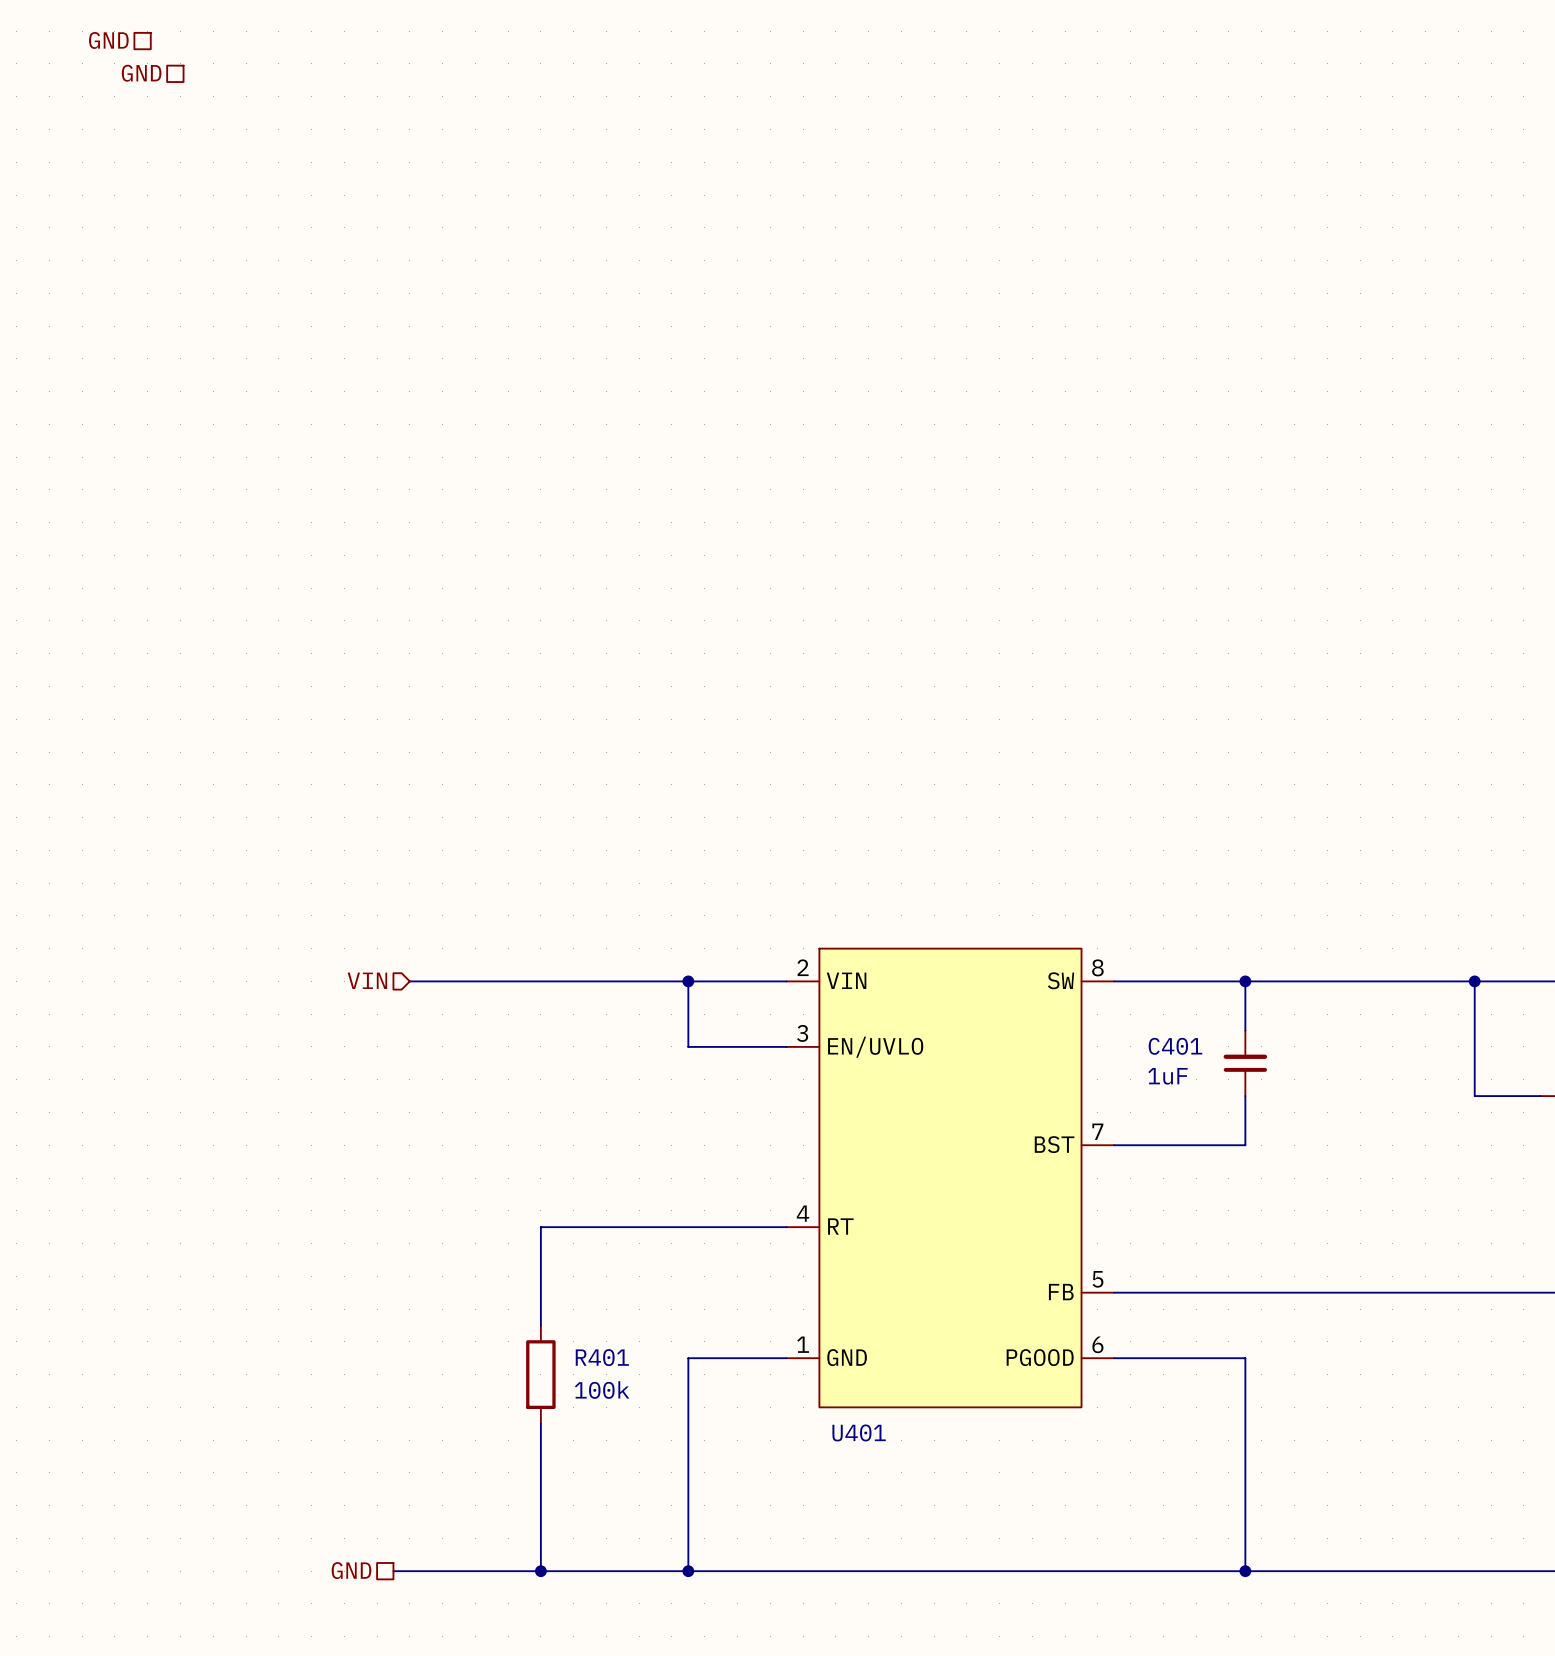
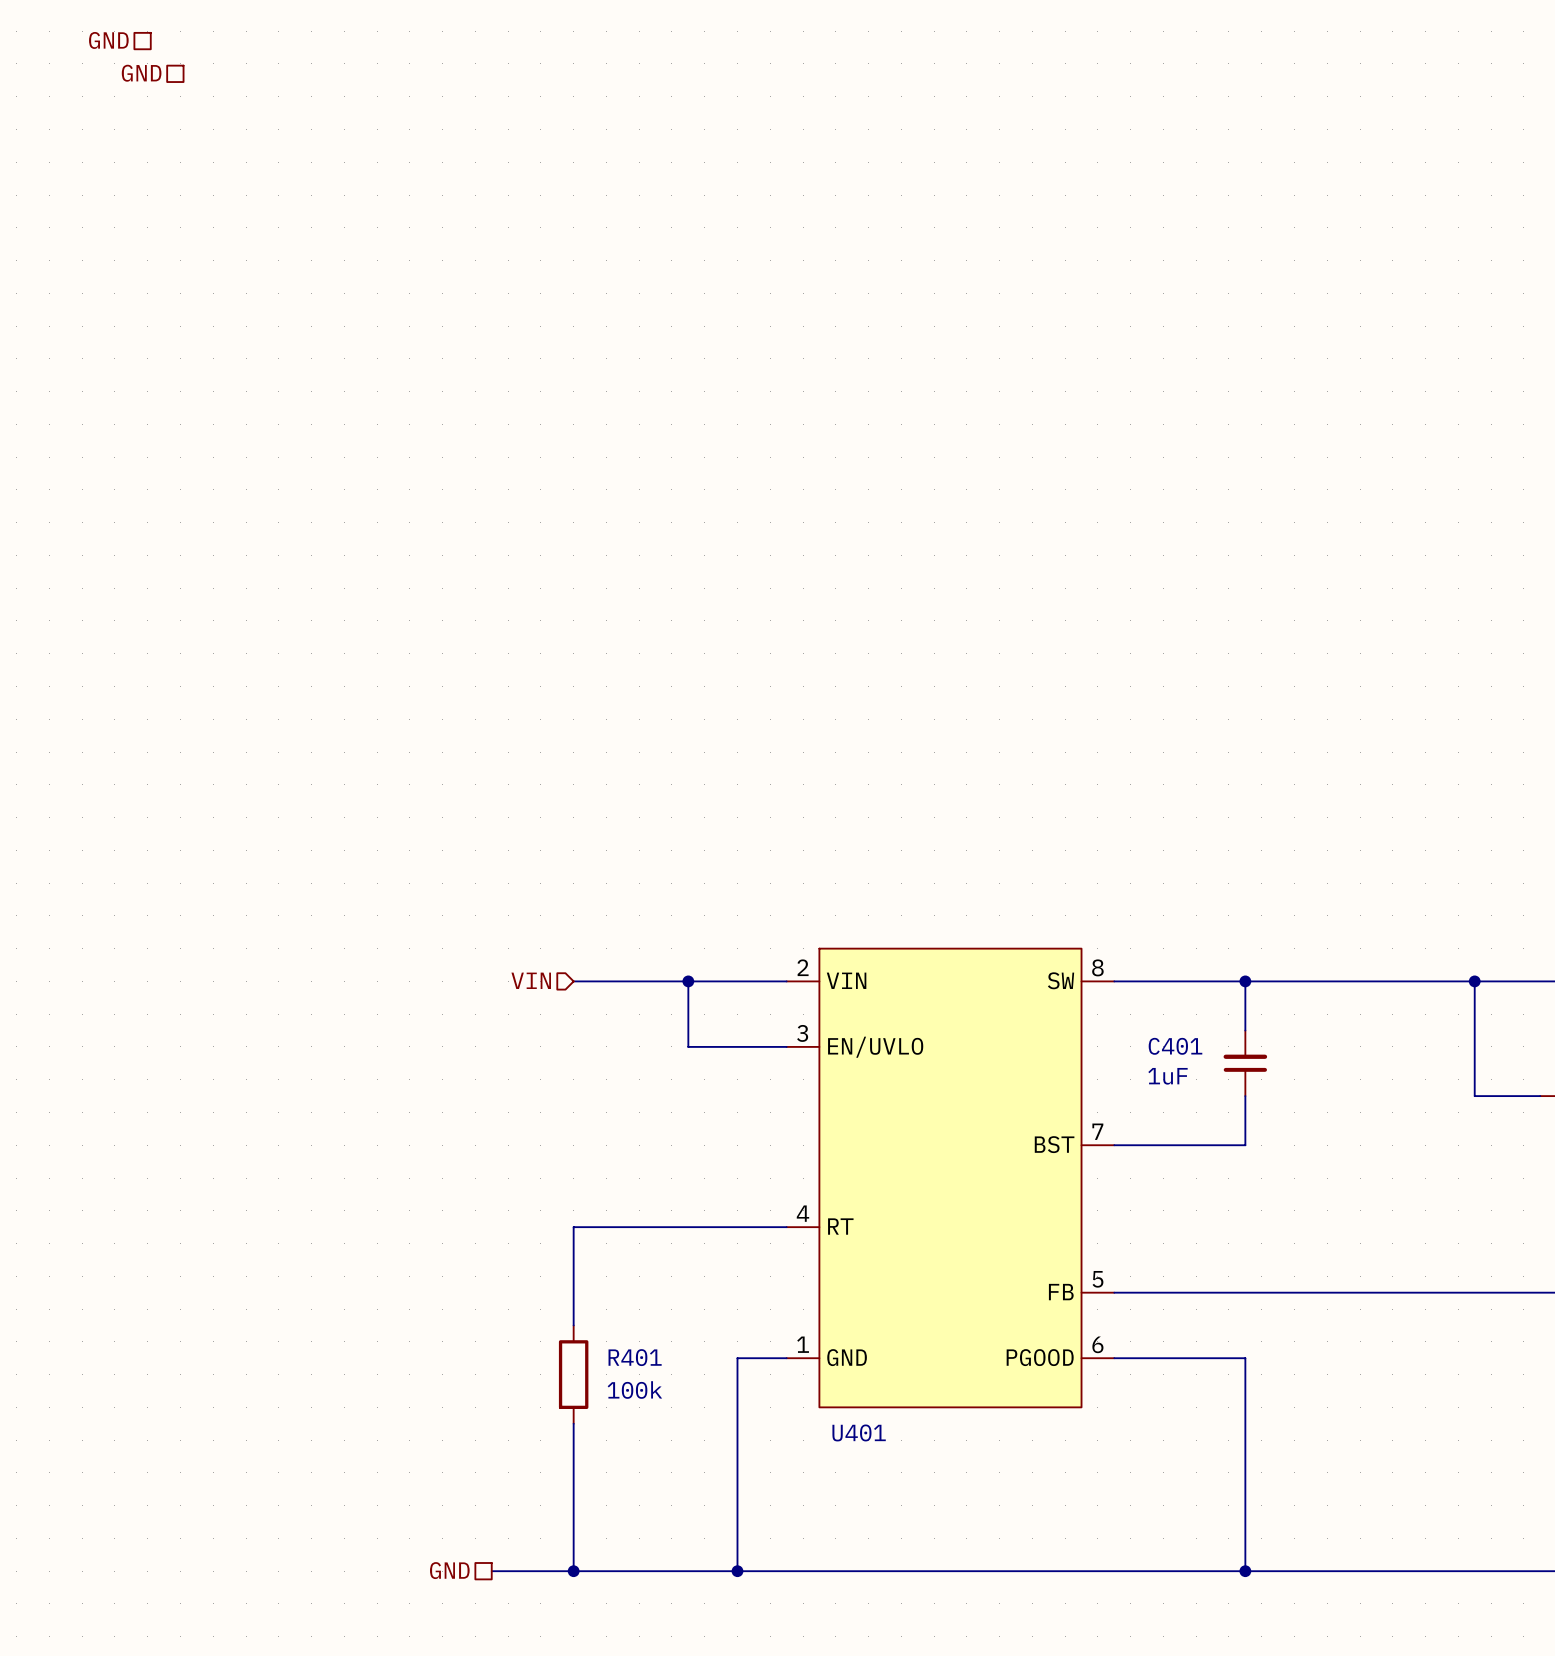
hierarchical label position: VIN (367, 980) -> VIN (531, 980)
wire: (409, 981) (573, 981) -> none
wire: (573, 1227) (540, 1227) (540, 1325) -> (573, 1227) (573, 1325)
wire: (737, 1358) (688, 1358) (688, 1571) -> (737, 1358) (737, 1571)
R401 position: (540, 1374) -> (573, 1374)
wire: (540, 1423) (540, 1571) -> (573, 1423) (573, 1571)
hierarchical label position: GND (351, 1570) -> GND (449, 1570)
wire: (393, 1571) (491, 1571) -> none
junction position: (540, 1571) -> (573, 1571)
junction position: (688, 1571) -> (737, 1571)

